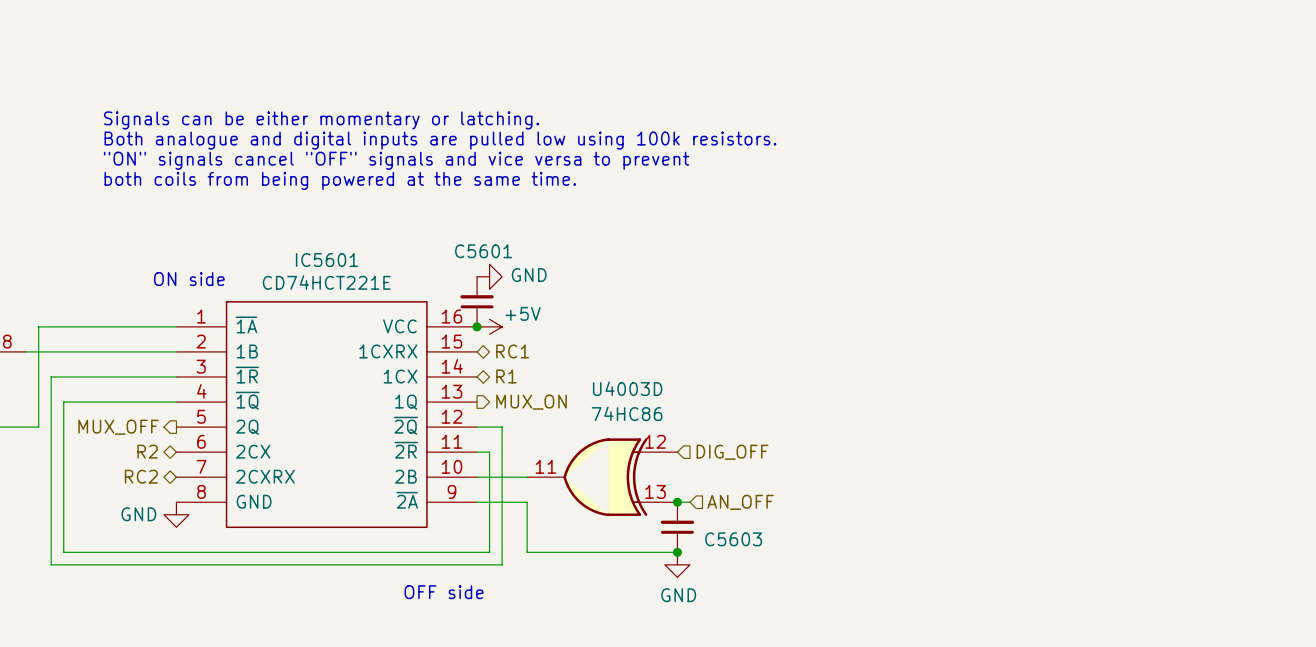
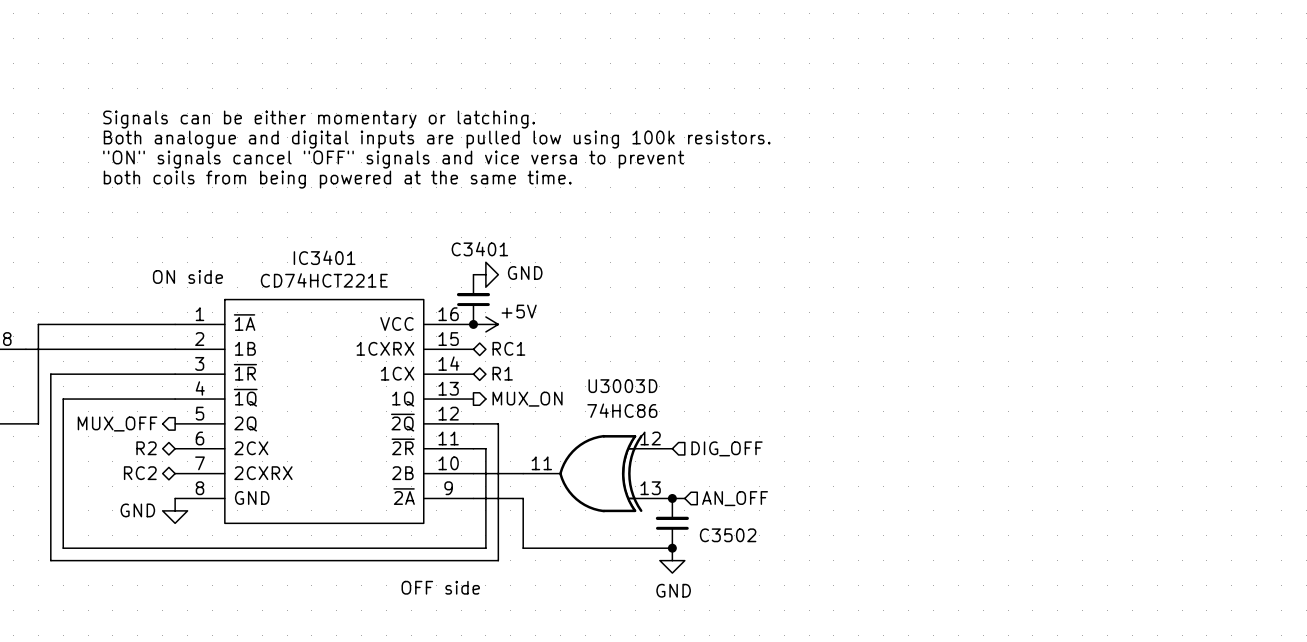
C5601 name: C5601 (483, 251) -> C3401 (479, 249)
IC5601 name: IC5601 (327, 260) -> IC3401 (324, 257)
U4003D name: U4003D (627, 388) -> U3003D (622, 386)
C5603 name: C5603 (733, 539) -> C3502 (728, 535)

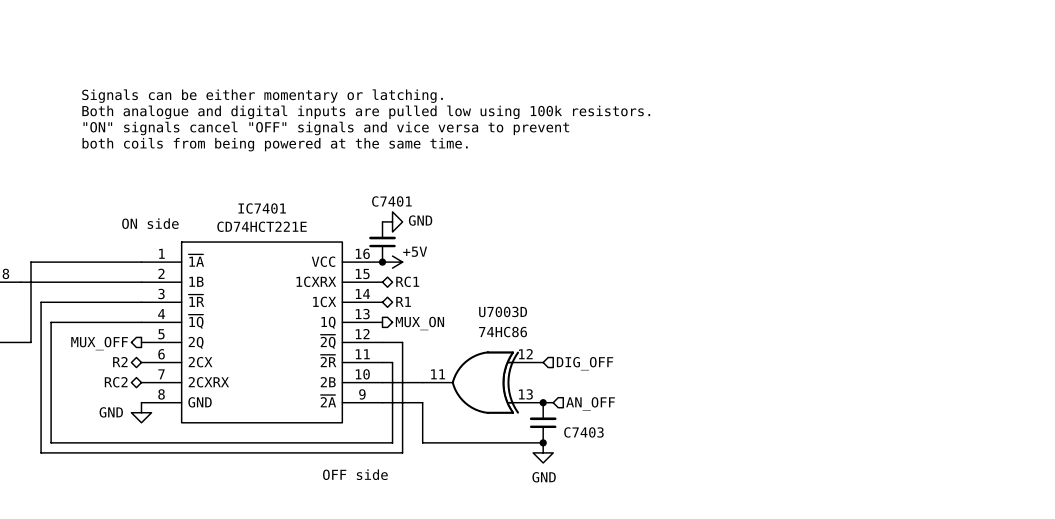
C3401 name: C3401 (479, 249) -> C7401 (391, 201)
IC3401 name: IC3401 (324, 257) -> IC7401 (262, 208)
U3003D name: U3003D (622, 386) -> U7003D (503, 311)
C3502 name: C3502 (728, 535) -> C7403 (583, 432)

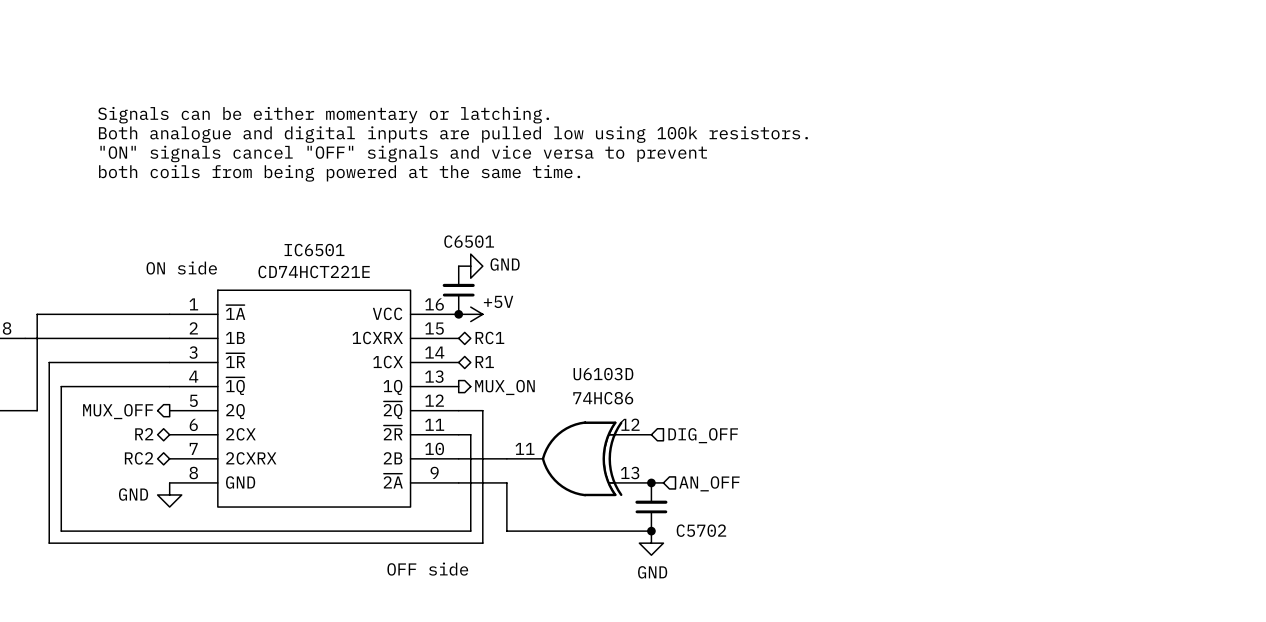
C7401 name: C7401 (391, 201) -> C6501 (469, 241)
IC7401 name: IC7401 (262, 208) -> IC6501 (314, 250)
U7003D name: U7003D (503, 311) -> U6103D (603, 374)
C7403 name: C7403 (583, 432) -> C5702 (701, 530)

